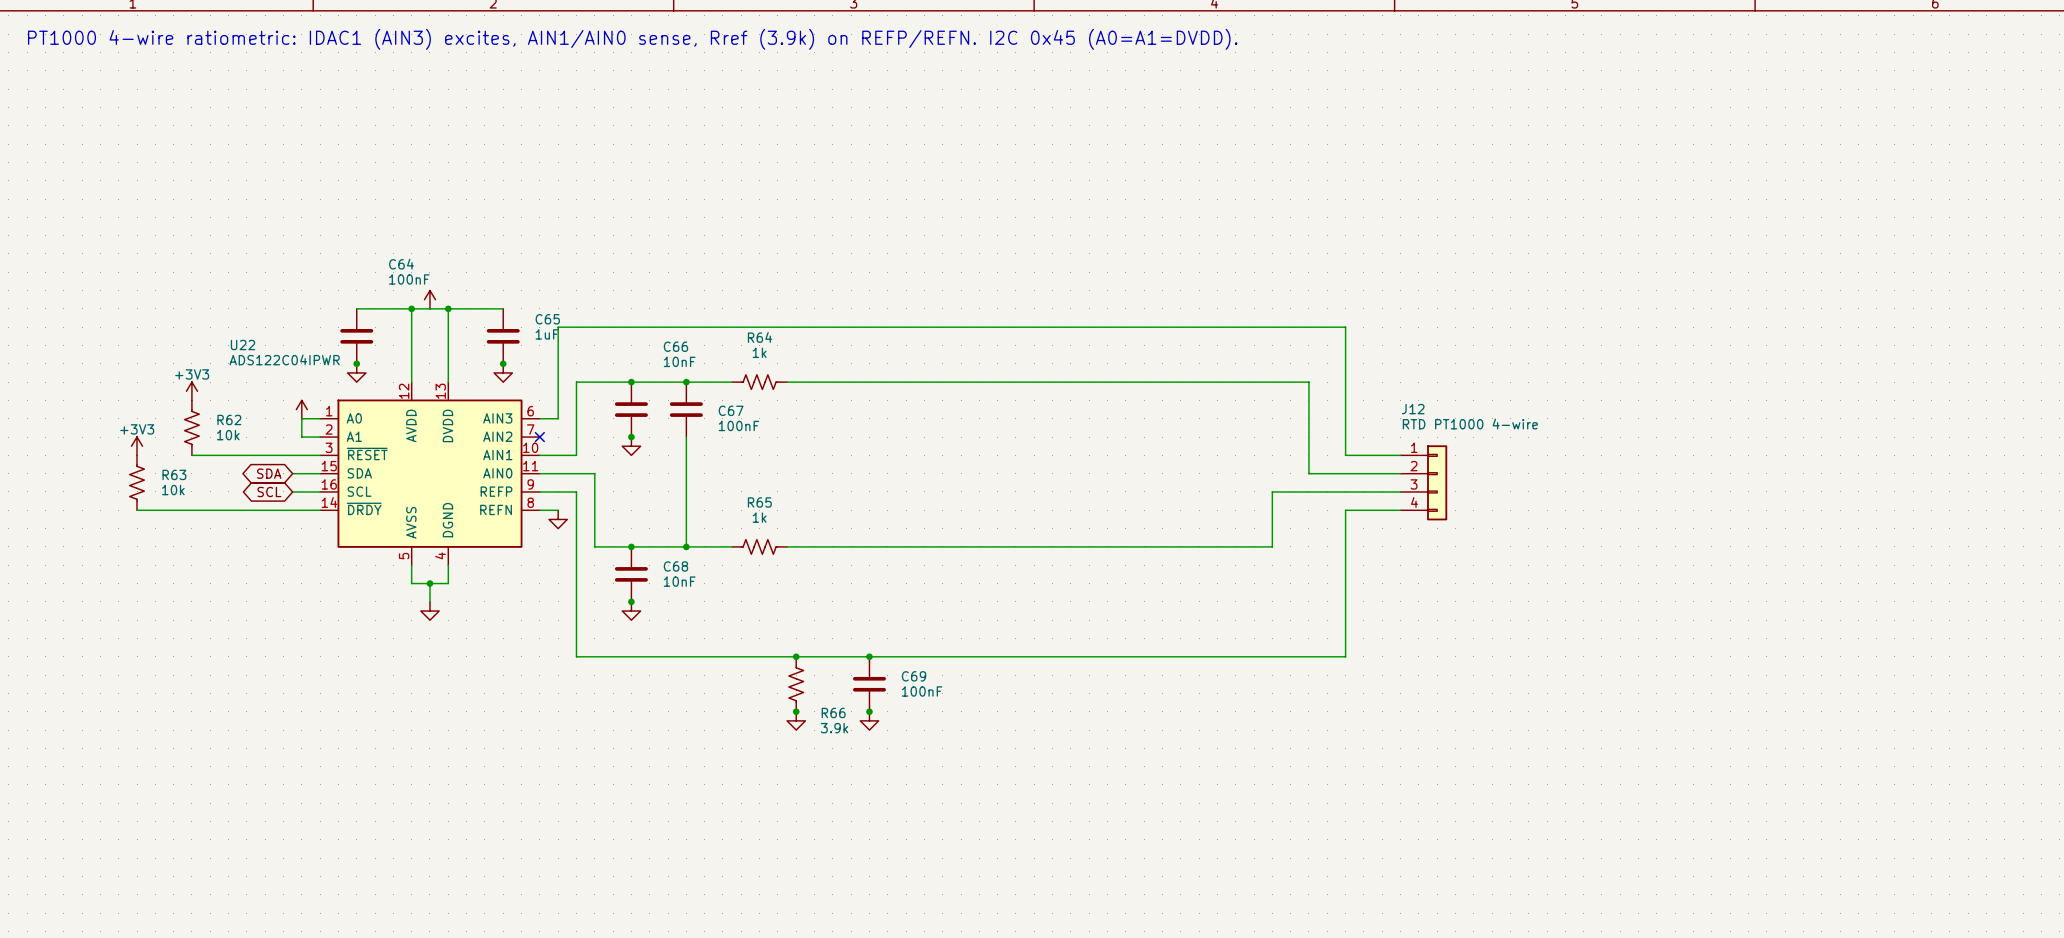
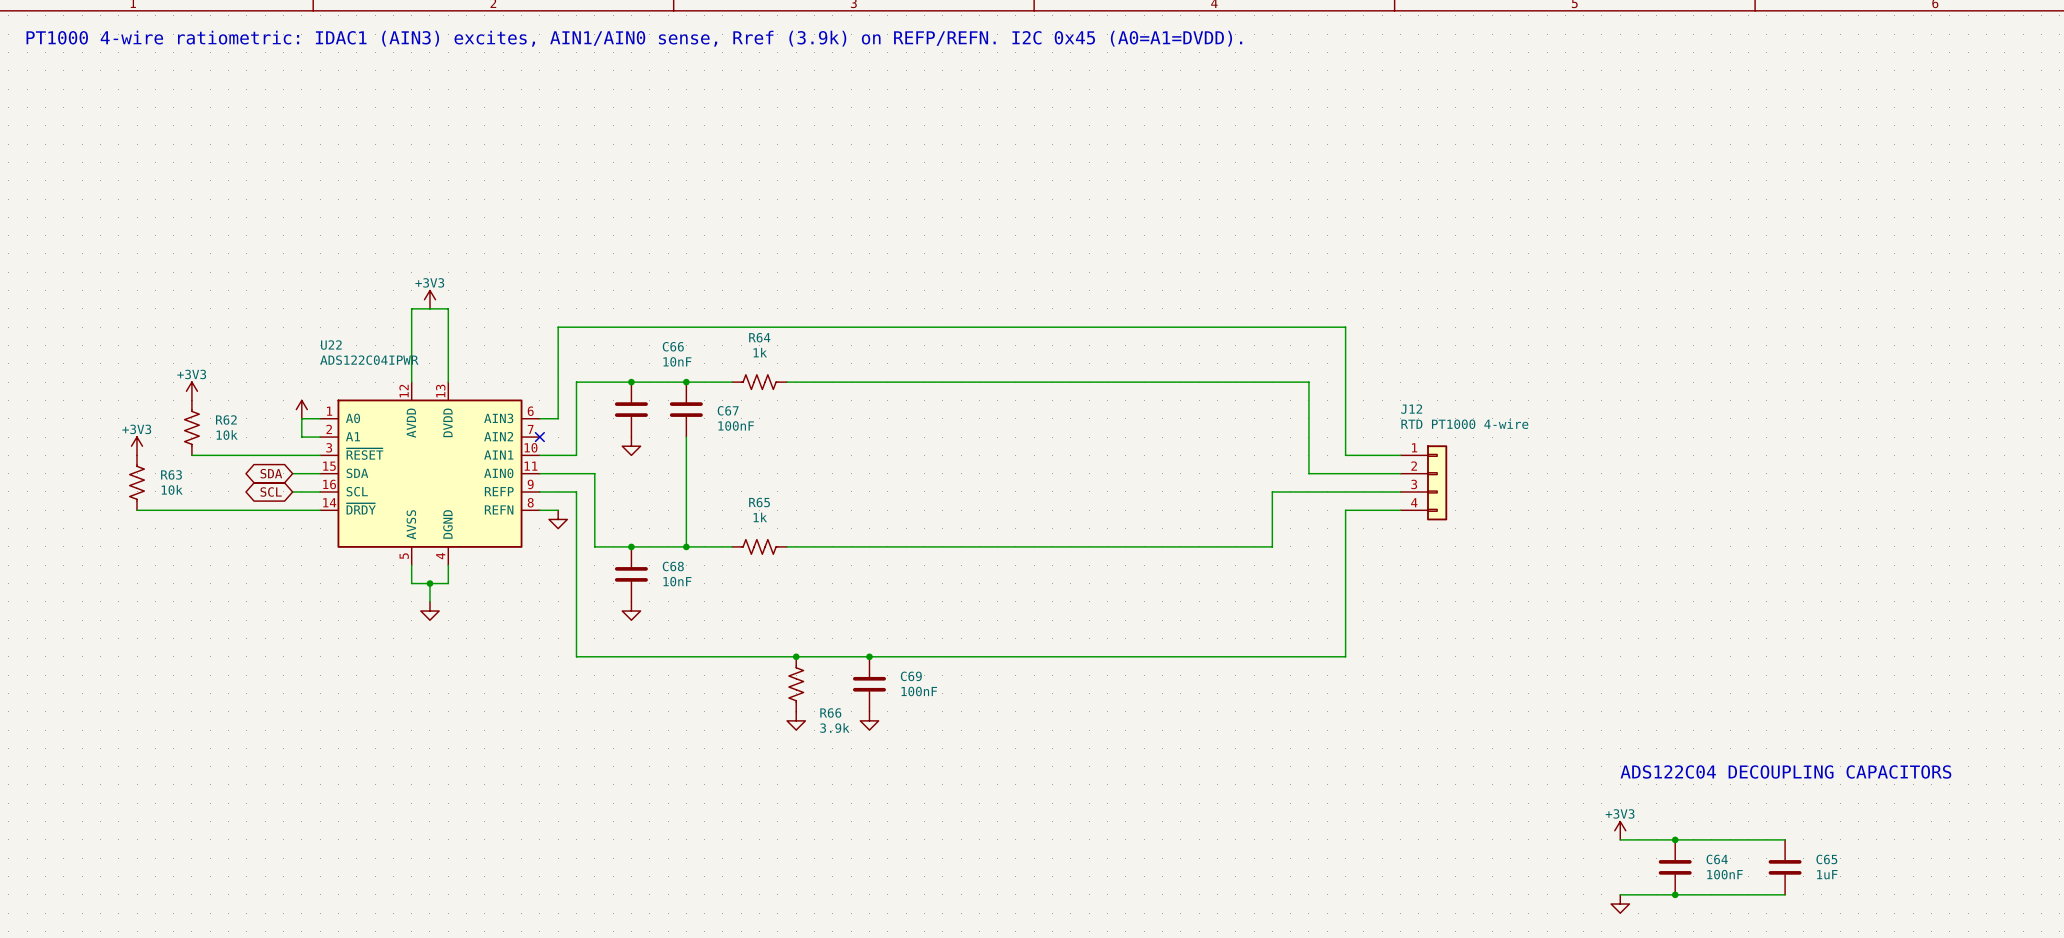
C64 name position: C64 (401, 264) -> C64 (1717, 859)
C64 value position: 100nF (409, 279) -> 100nF (1725, 874)
power symbol text: none -> +3V3 (429, 282)
wire: (356, 308) (411, 308) -> none
junction: (411, 308) -> none
wire: (448, 308) (503, 308) -> none
junction: (448, 308) -> none
C65 name position: C65 (547, 319) -> C65 (1826, 859)
C65 value position: 1uF (547, 334) -> 1uF (1827, 874)
C64 position: (356, 336) -> (1675, 867)
C65 position: (503, 336) -> (1785, 867)
U22 name position: U22 (243, 345) -> U22 (331, 345)
U22 value position: ADS122C04IPWR (284, 359) -> ADS122C04IPWR (369, 360)
junction: (356, 363) -> none
junction: (503, 363) -> none
power symbol: (356, 372) -> none
power symbol: (503, 372) -> none
junction: (631, 437) -> none
junction: (631, 601) -> none
junction: (796, 711) -> none
junction: (869, 711) -> none
text: none -> ADS122C04 DECOUPLING CAPACITORS (1785, 771)
power symbol: none -> +3V3 (1620, 830)
wire: none -> (1620, 839) (1785, 839)
junction: none -> (1675, 839)
wire: none -> (1620, 894) (1785, 894)
junction: none -> (1675, 894)
power symbol: none -> (1620, 904)

